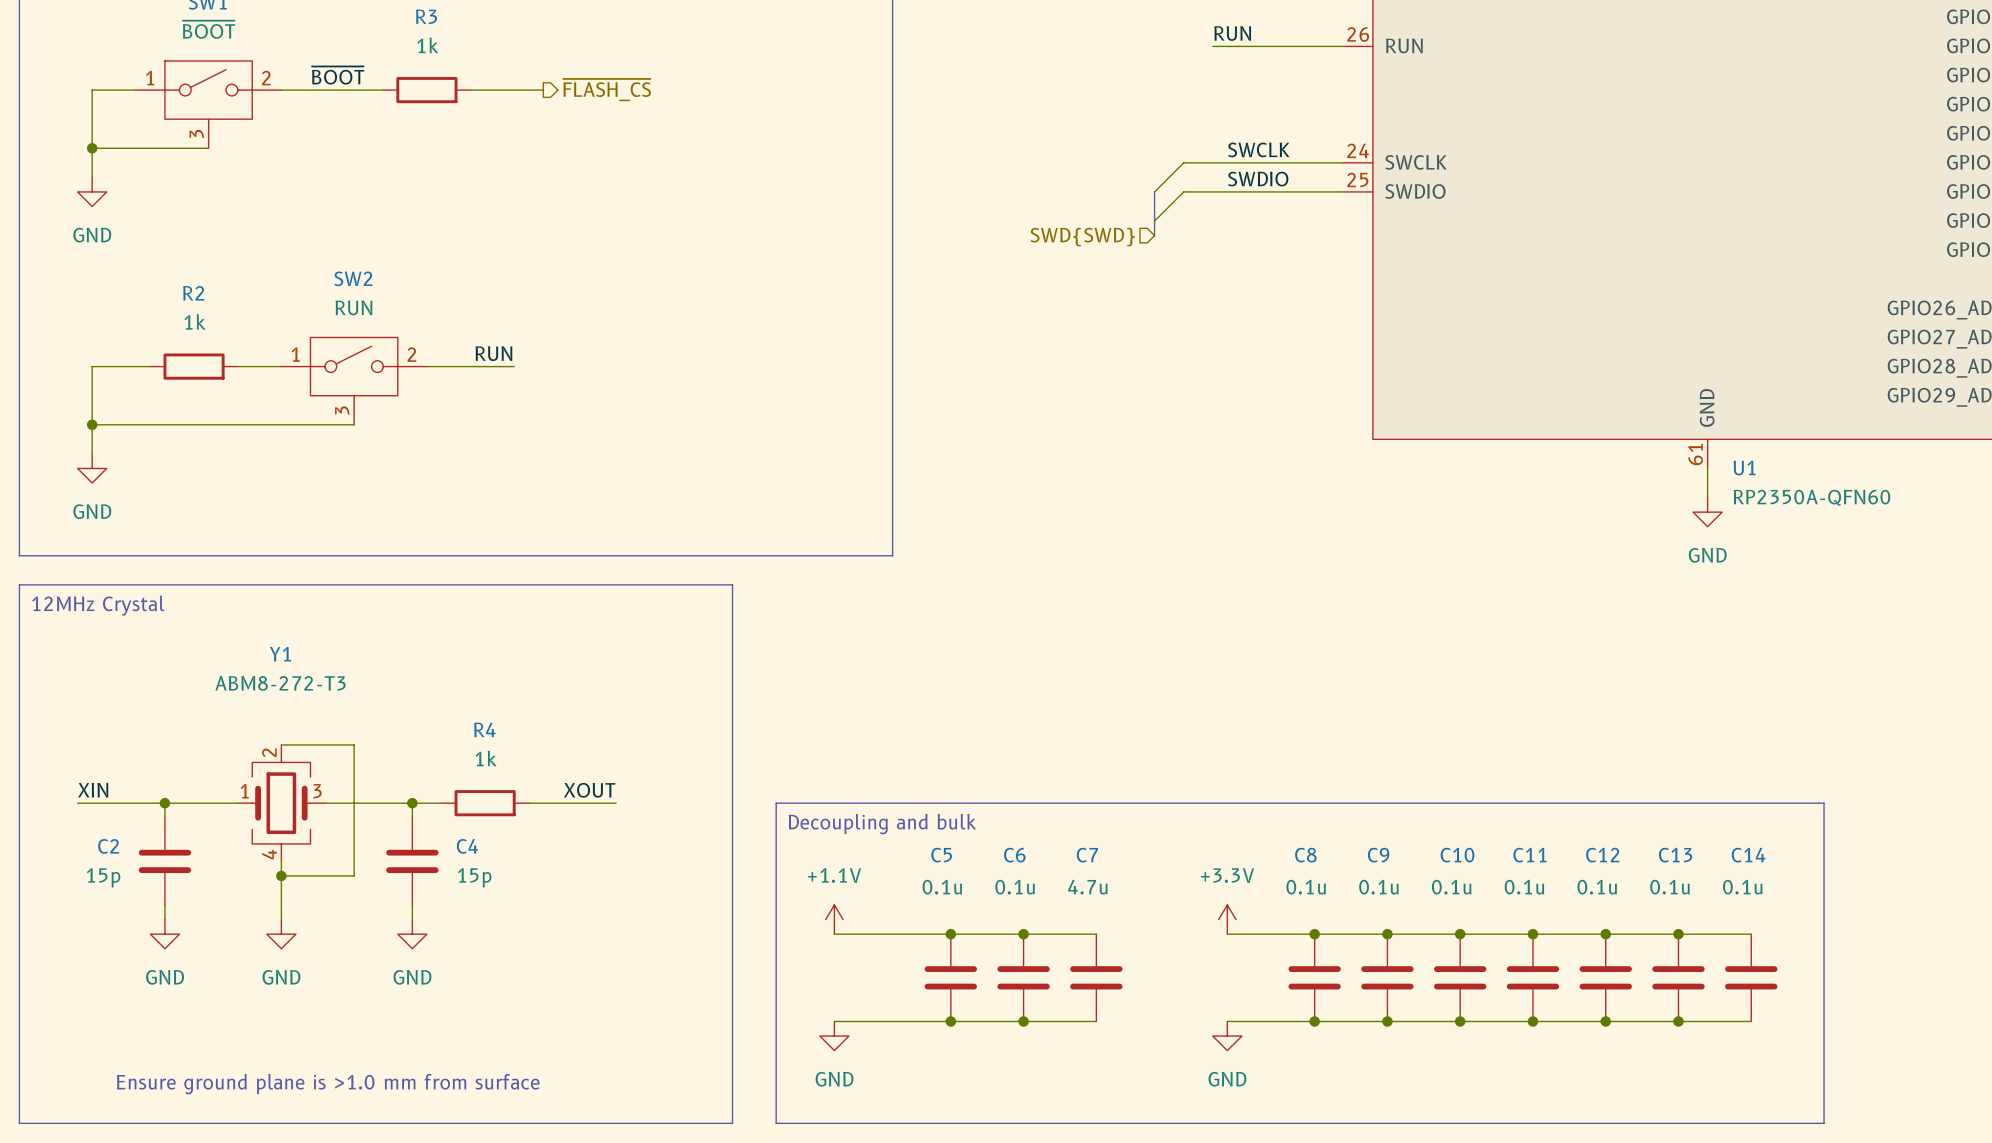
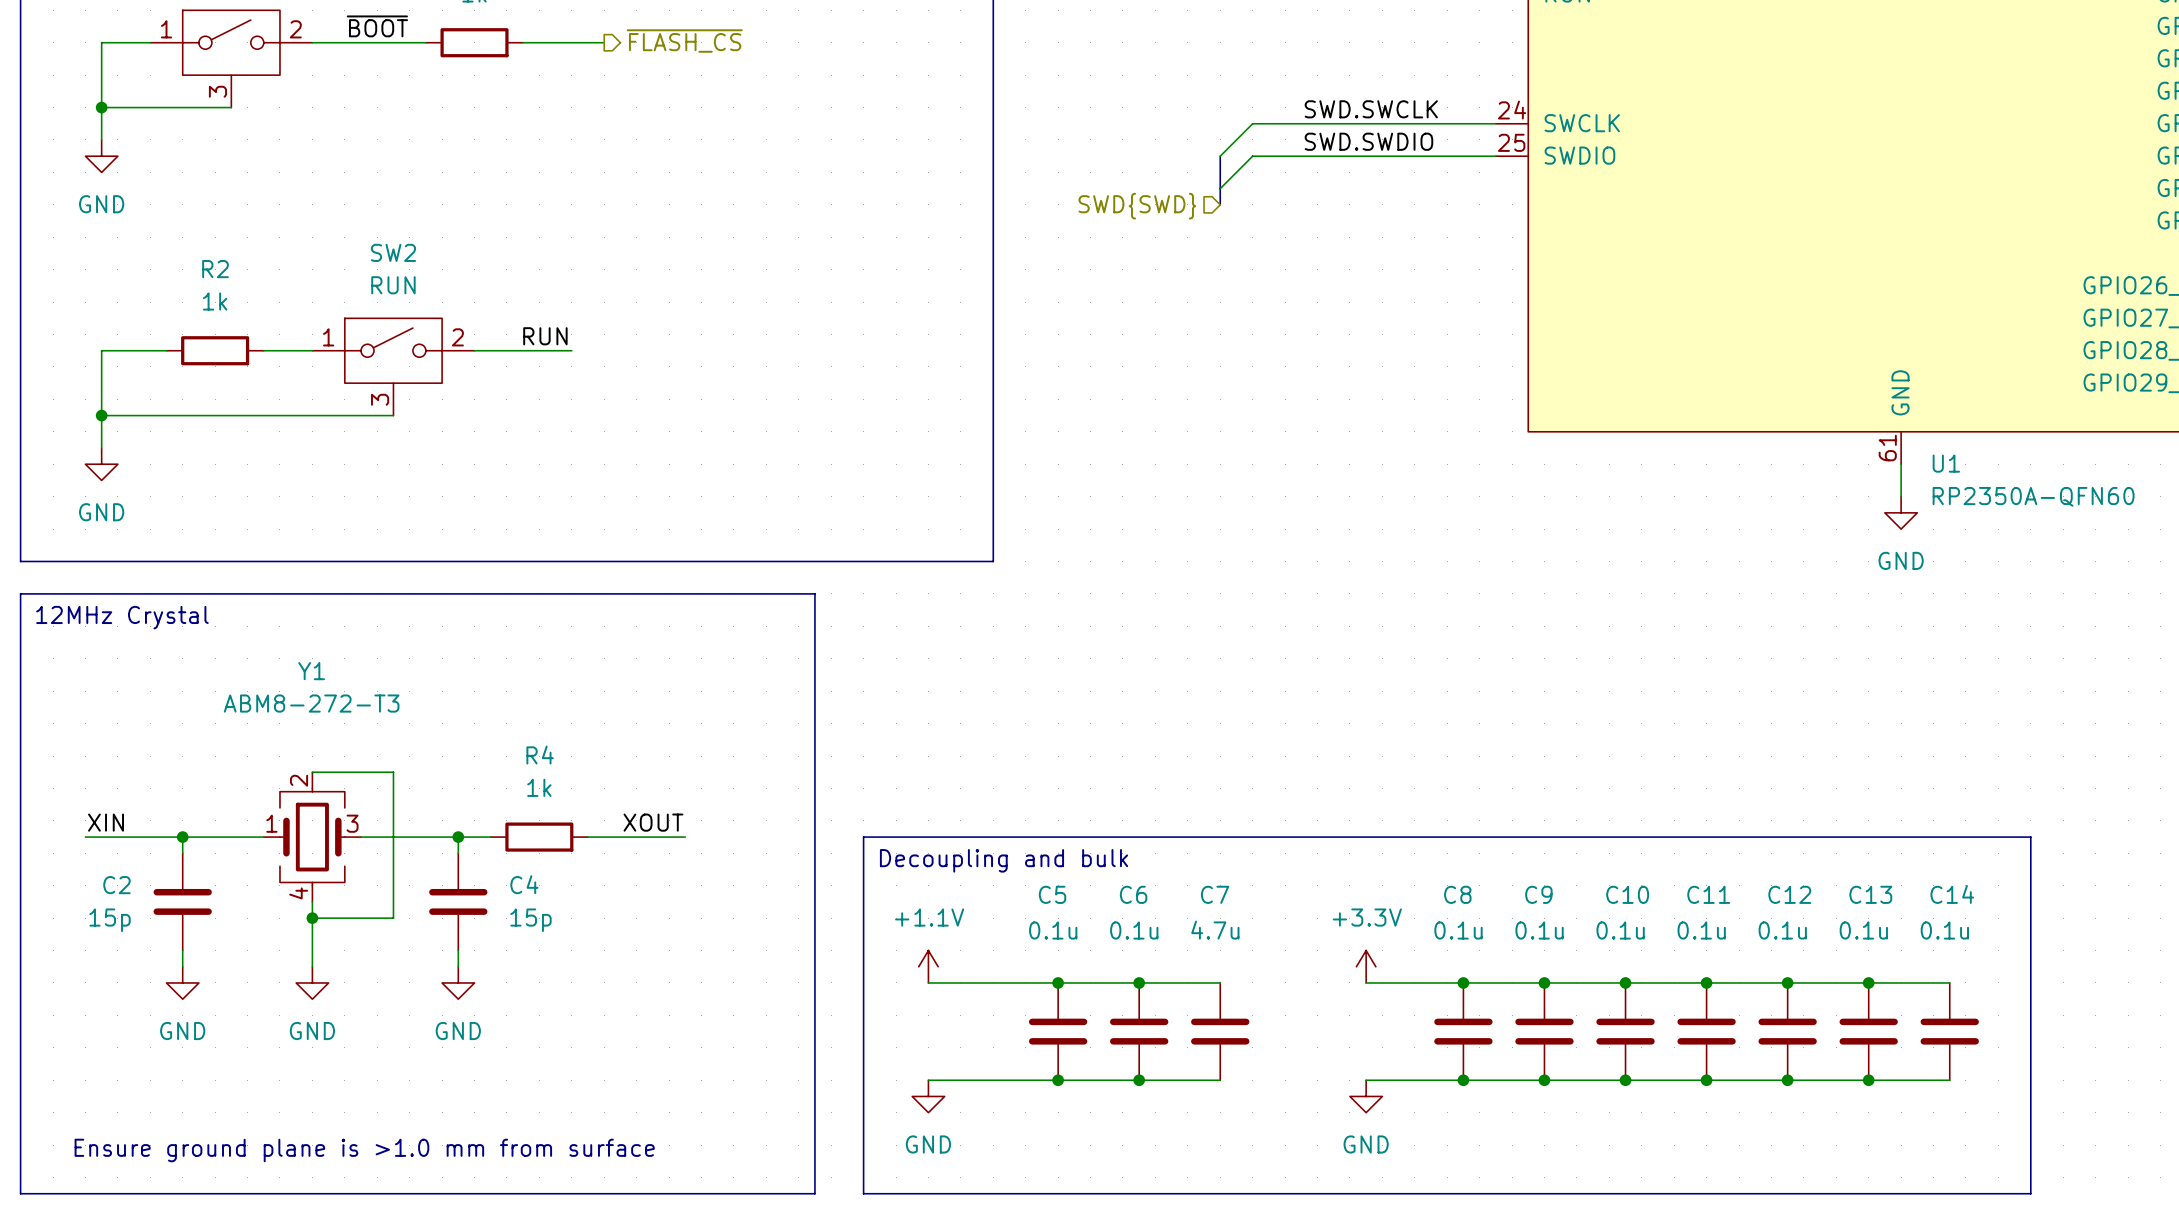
label: SWCLK (1258, 149) -> SWD.SWCLK (1371, 109)
wire: (1183, 162) (1154, 191) -> (1317, 123) (1252, 123) (1220, 156)
label: SWDIO (1258, 179) -> SWD.SWDIO (1368, 141)
bus: (1154, 191) (1154, 235) -> (1220, 156) (1220, 204)
wire: (1183, 191) (1154, 221) -> (1317, 156) (1252, 156) (1220, 188)
hierarchical label position: SWD{SWD} (1082, 237) -> SWD{SWD} (1137, 206)

